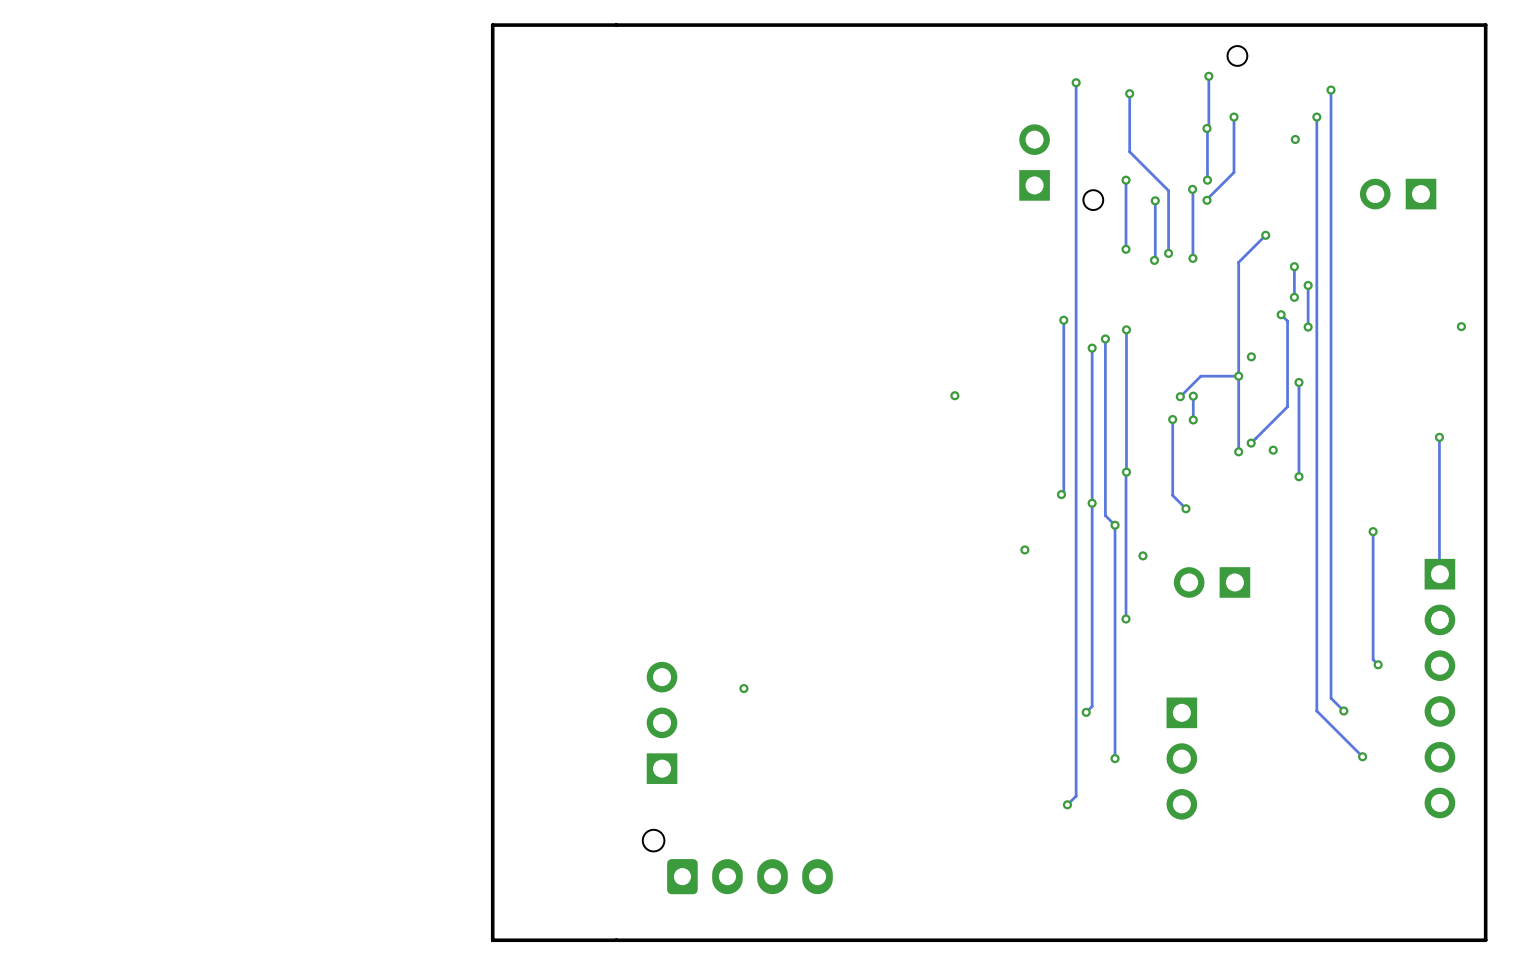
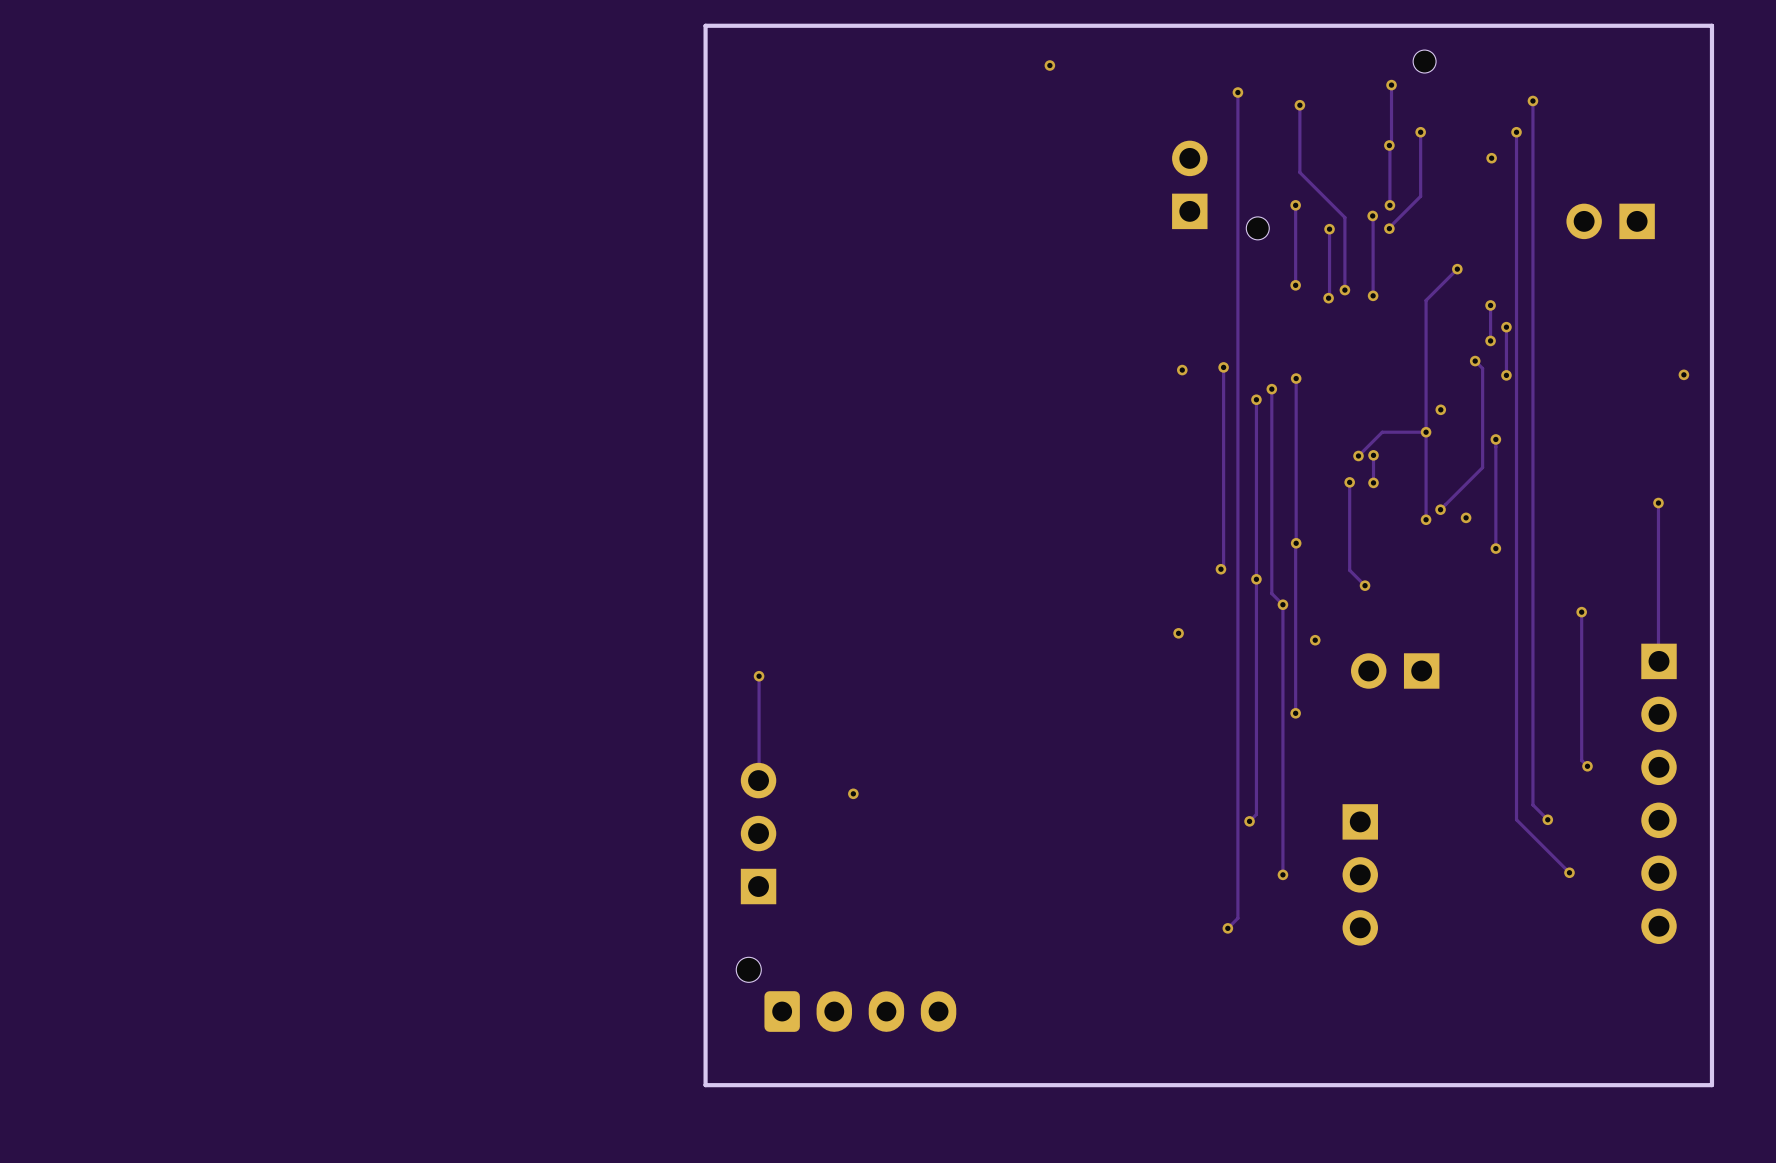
board edge: (616, 25) (492, 25) (492, 940) (616, 940) -> (705, 25) (705, 1085)
via: none -> (1049, 65)
via position: (954, 395) -> (1182, 370)
track: none -> (759, 676) (759, 780)
via: none -> (759, 676)

